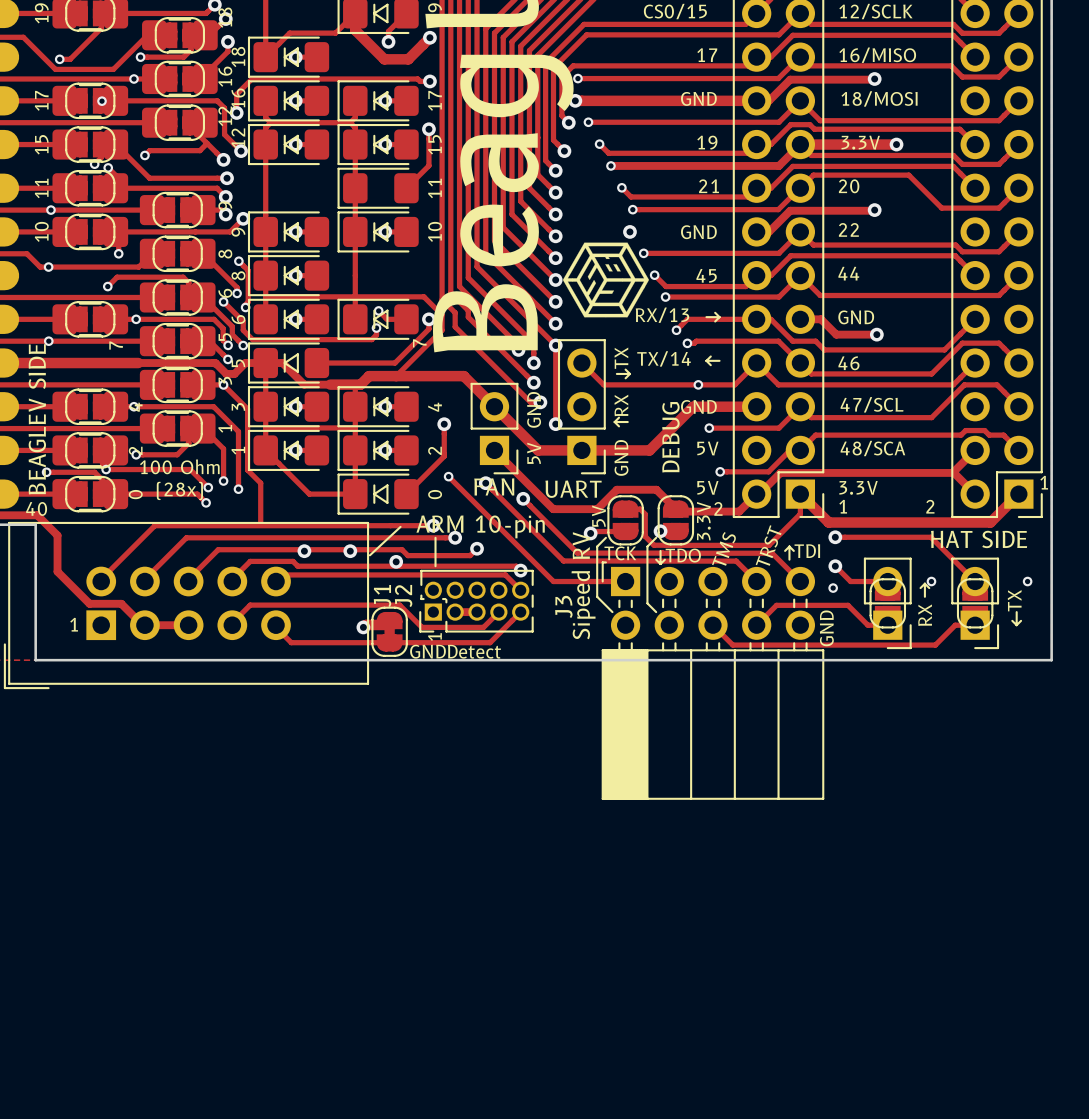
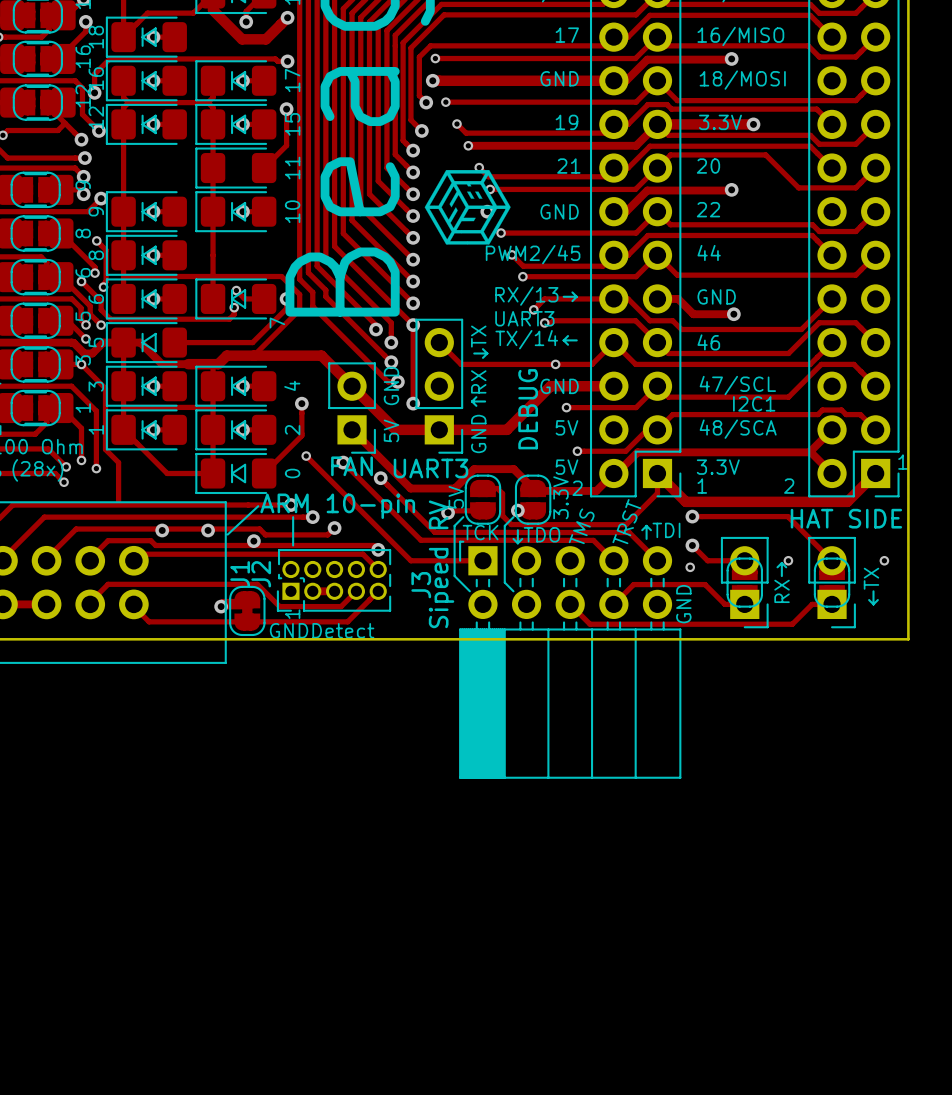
text: none -> PWM2/45 (533, 254)
text: 45 (706, 275) -> none
drawing position: (605, 279) -> (467, 207)
text: none -> UART3 (524, 318)
text: none -> I2C1 (754, 403)
text: UART (573, 489) -> UART3 (431, 468)

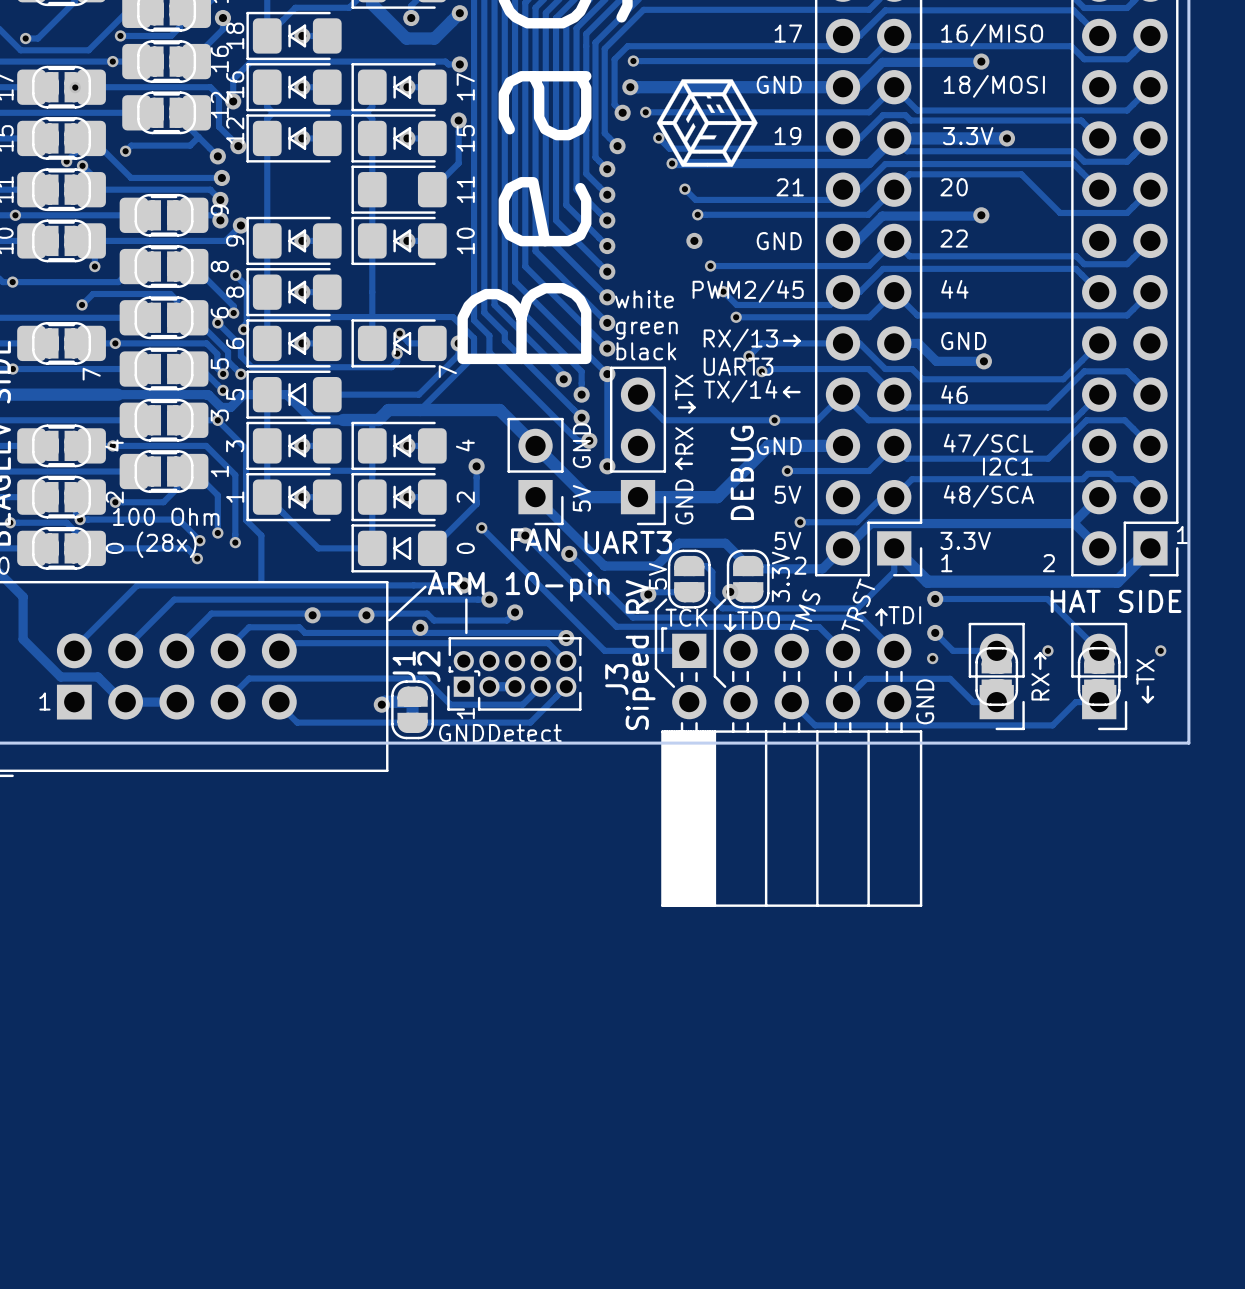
drawing position: (467, 207) -> (707, 123)
text: none -> white (644, 299)
text: none -> green (646, 330)
text: none -> black (646, 351)

